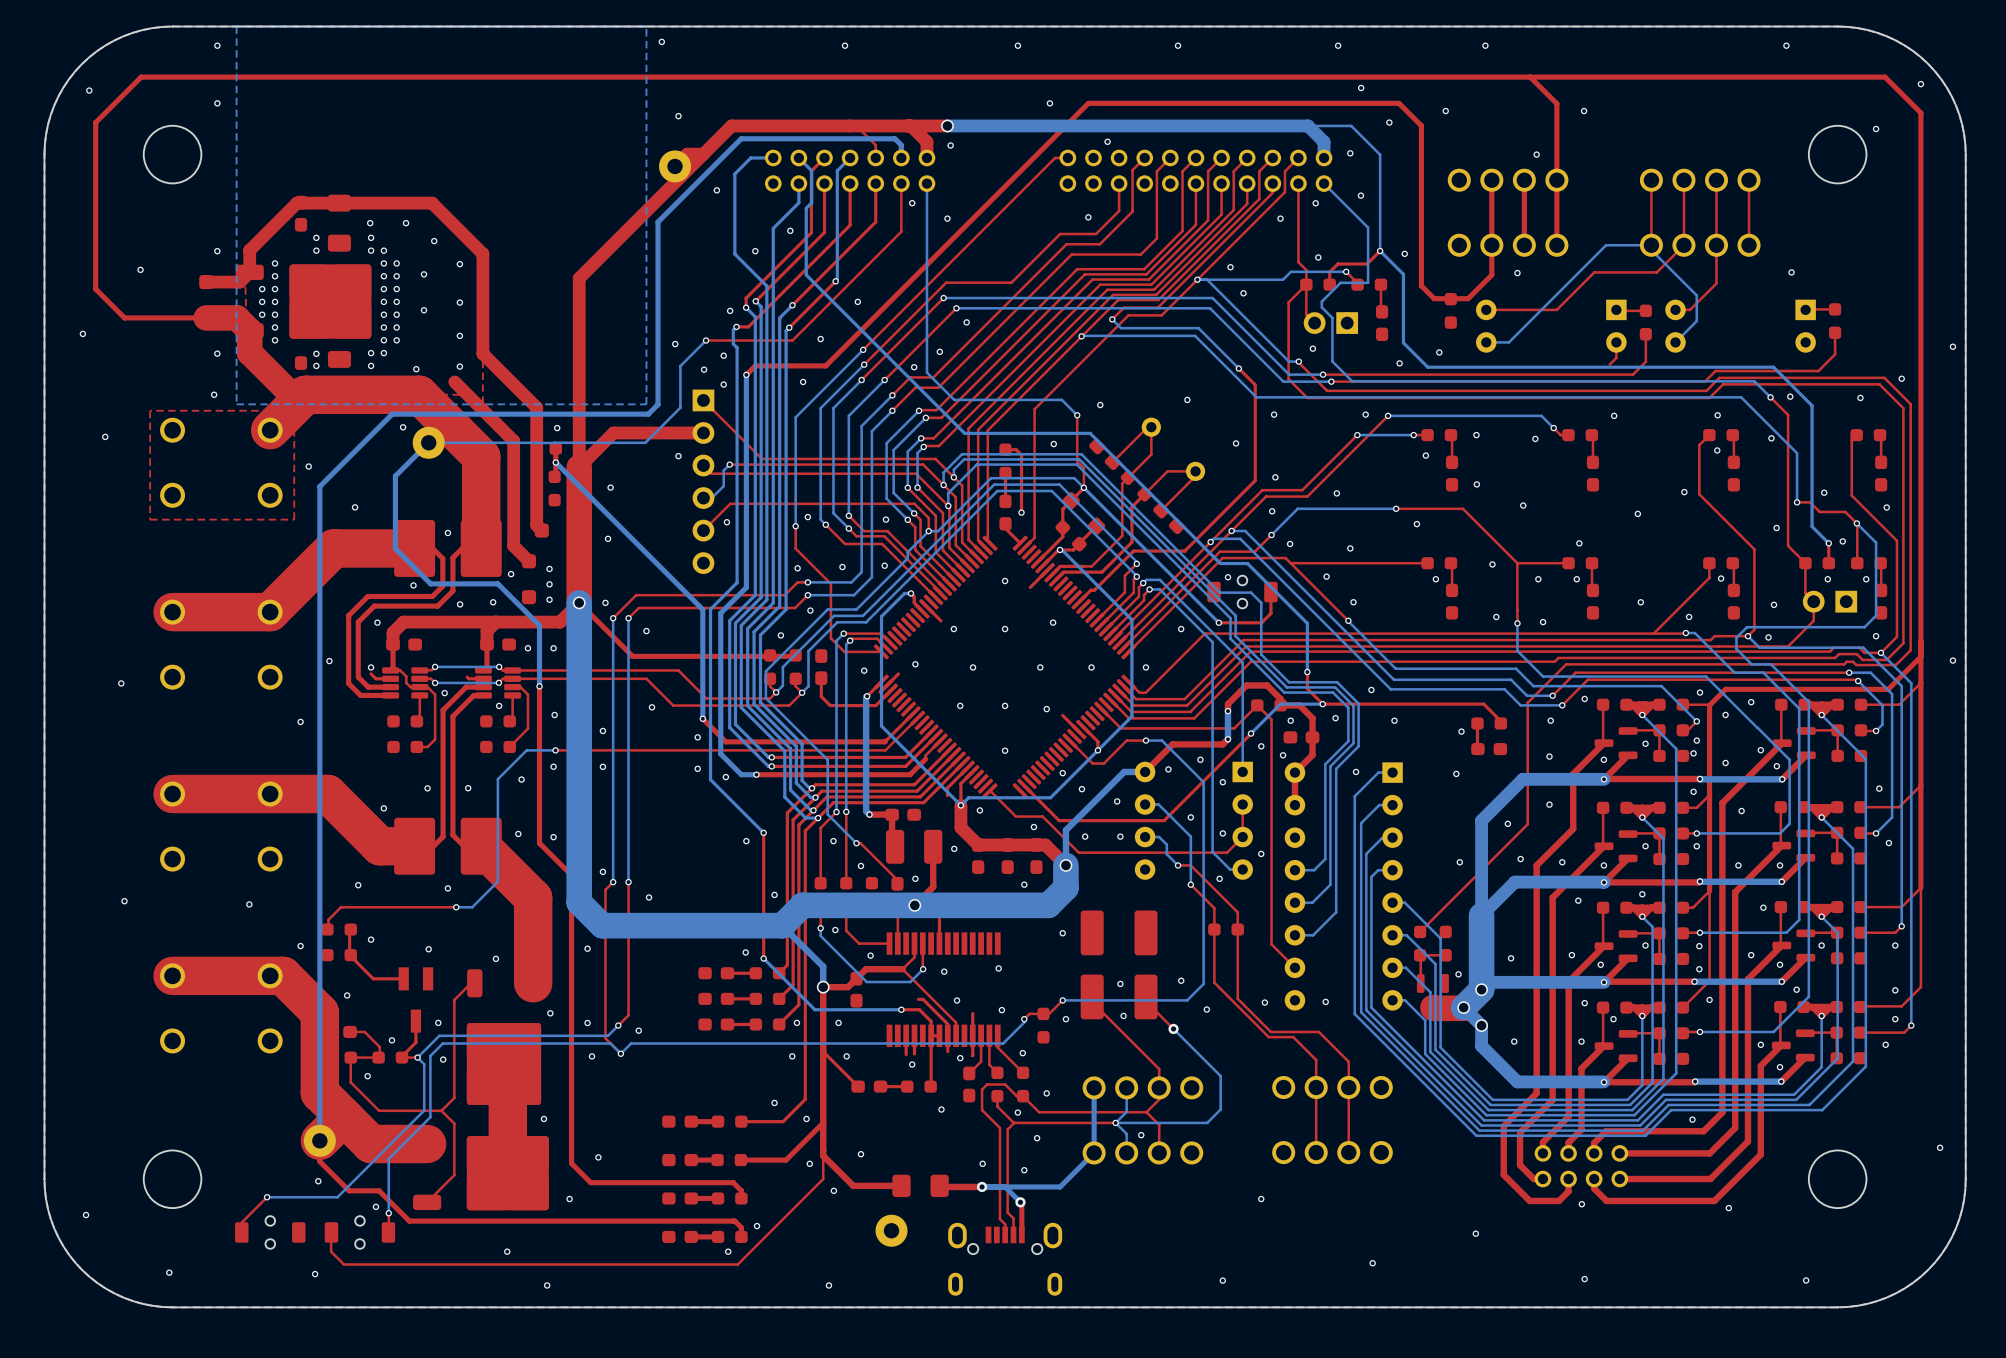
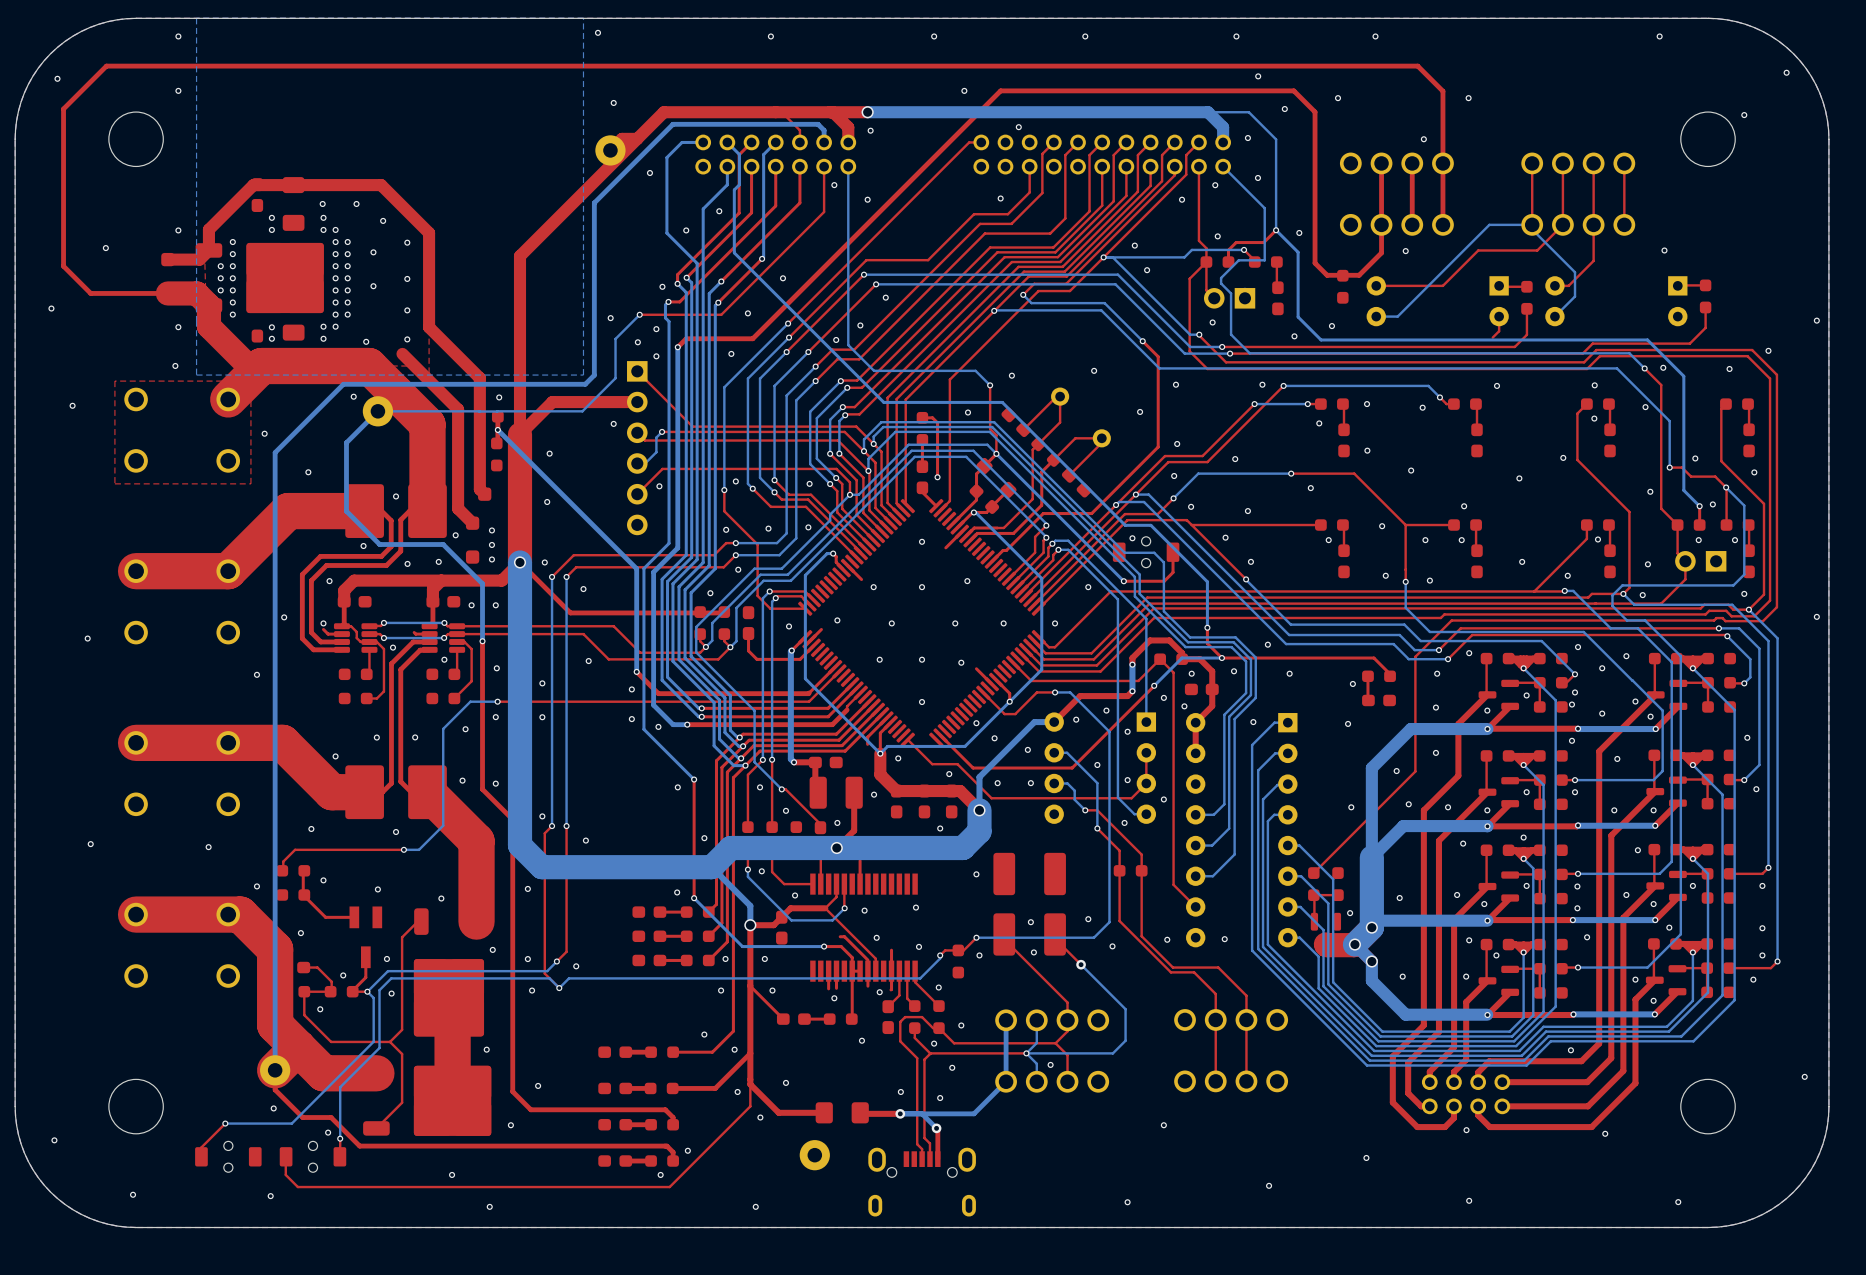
top track: (1530, 77) (1885, 77) (1920, 112) (1920, 887) -> none
top track: (1920, 656) (1888, 689) (1725, 689) (1709, 705) -> none
top track: (1920, 682) (1899, 704) (1861, 704) -> none
top track: (1682, 704) (1709, 705) -> none
top track: (1709, 705) (1709, 891) -> none
top track: (1920, 785) (1899, 807) (1860, 807) -> none
top track: (1709, 795) (1696, 807) (1682, 807) -> none
top track: (1920, 887) (1901, 907) (1860, 907) -> none
top track: (1920, 887) (1920, 987) (1901, 1006) (1860, 1006) -> none
top track: (1709, 891) (1692, 907) (1682, 907) -> none
top track: (1709, 891) (1709, 980) (1682, 1007) -> none

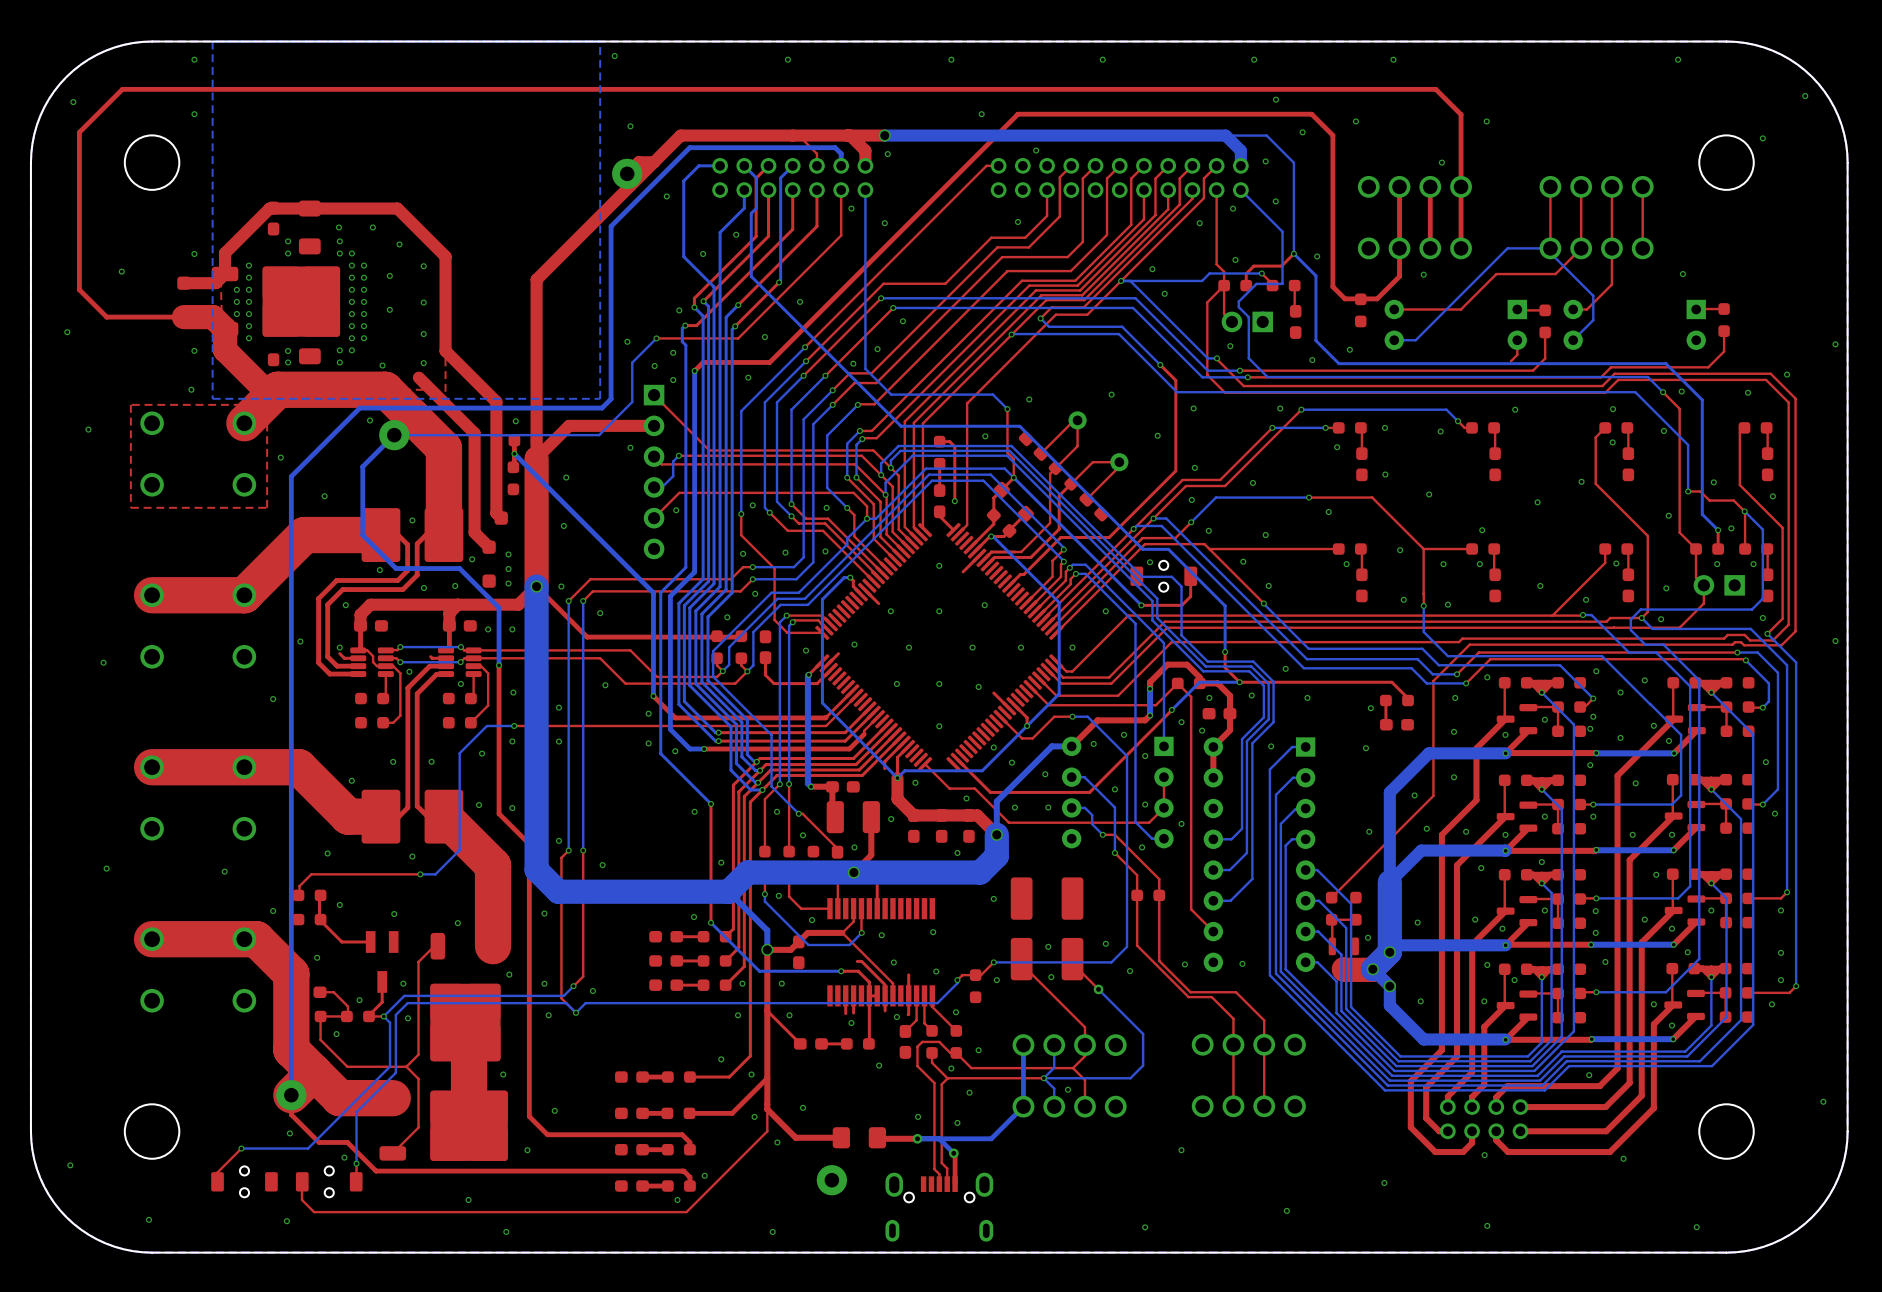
top track: (1102, 166) (1102, 205) (1055, 252) (997, 252) (861, 387) (847, 387) -> none
bottom track: (847, 387) (816, 418) (816, 458) (836, 478) -> none
via: (847, 387) -> none
top track: (836, 478) (842, 484) (842, 508) (873, 540) -> none
via: (836, 478) -> none
top track: (1748, 609) (1733, 609) (1728, 604) (1704, 604) (1700, 608) (1153, 608) (1096, 665) (1041, 665) (1026, 649) -> none

